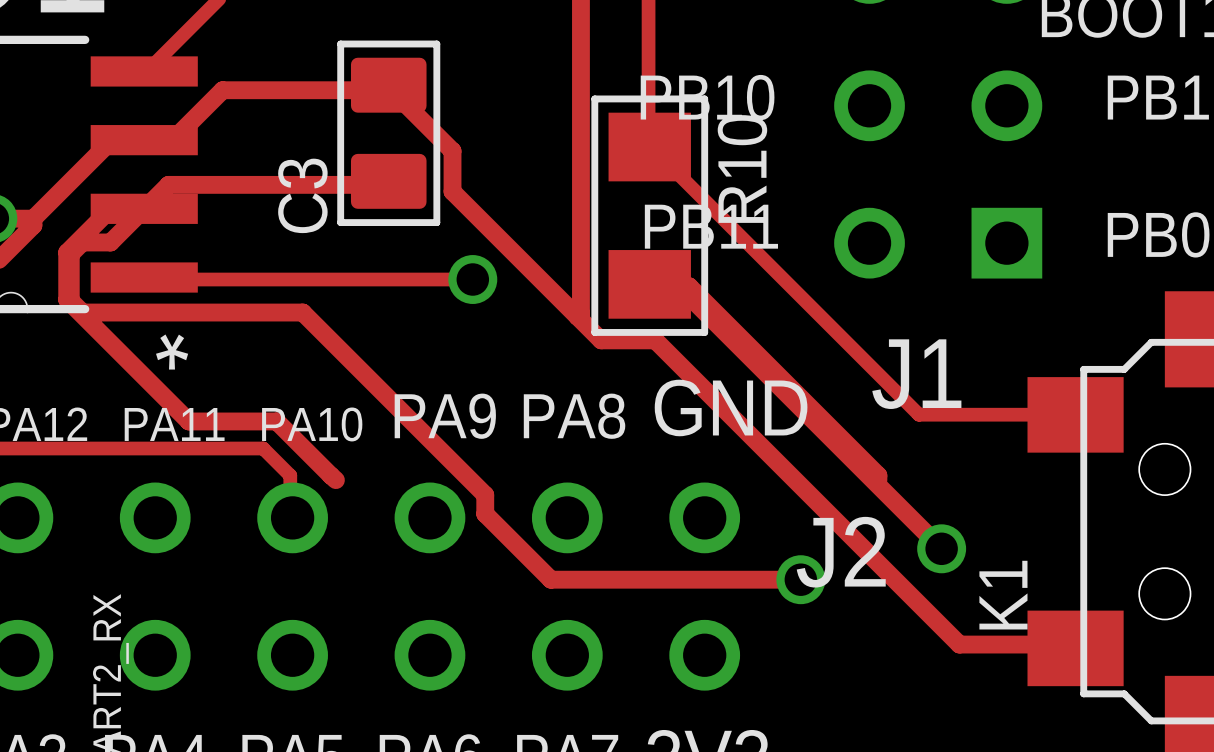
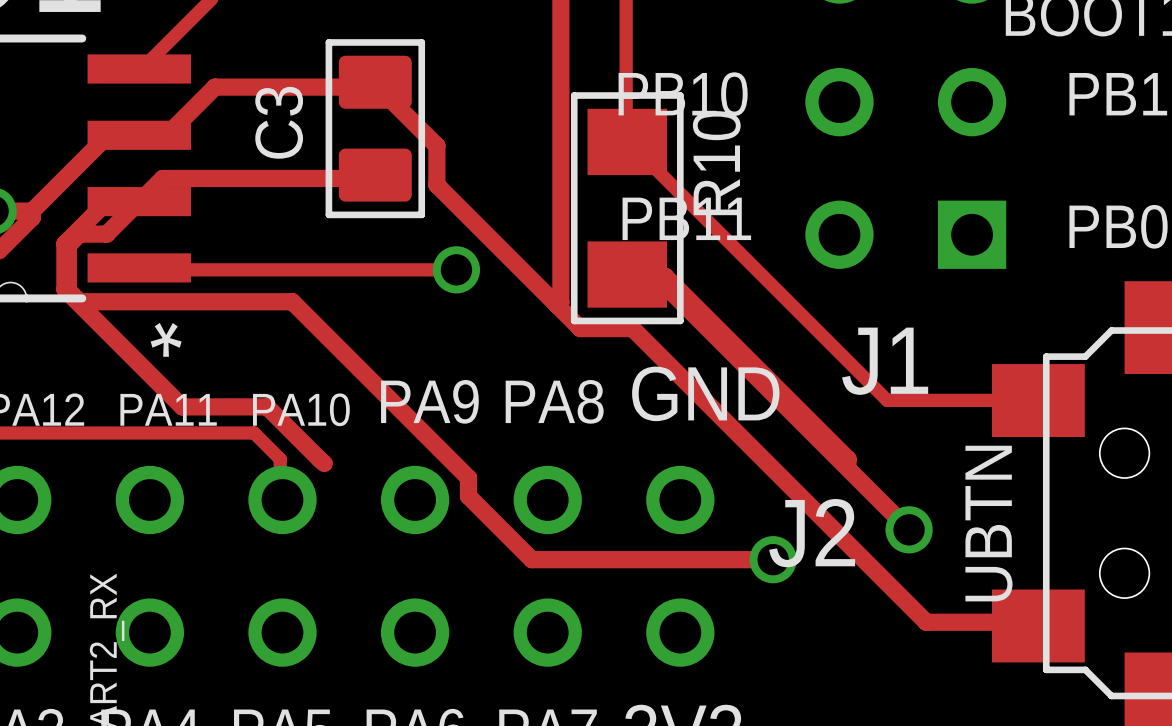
C3 name position: C3 (302, 195) -> C3 (279, 122)
K1 name: K1 (1003, 595) -> UBTN (988, 523)

